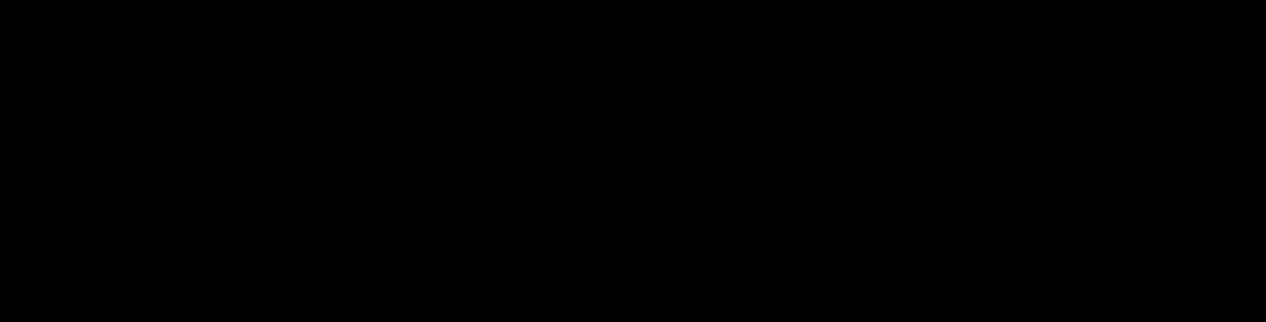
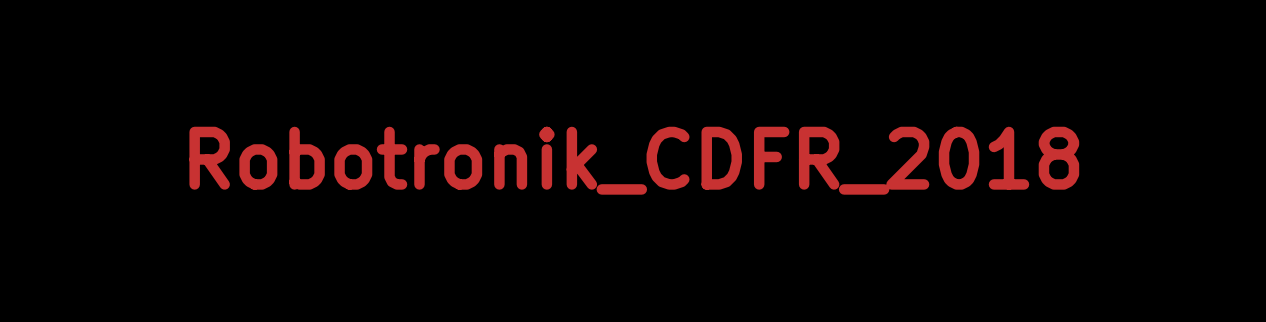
text: none -> Robotronik_CDFR_2018 (634, 160)

